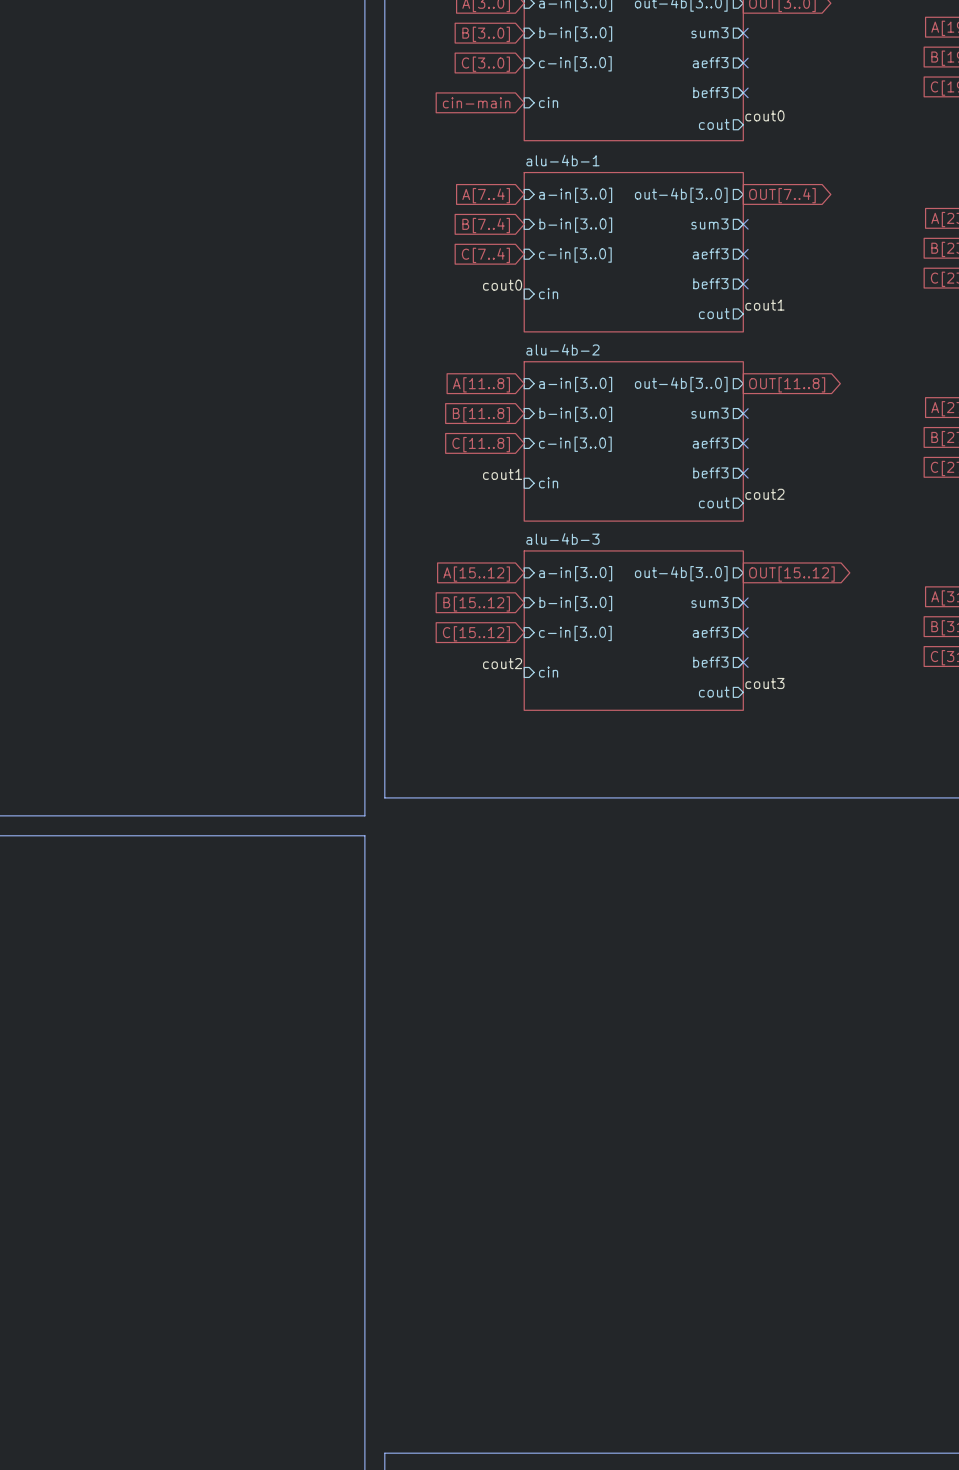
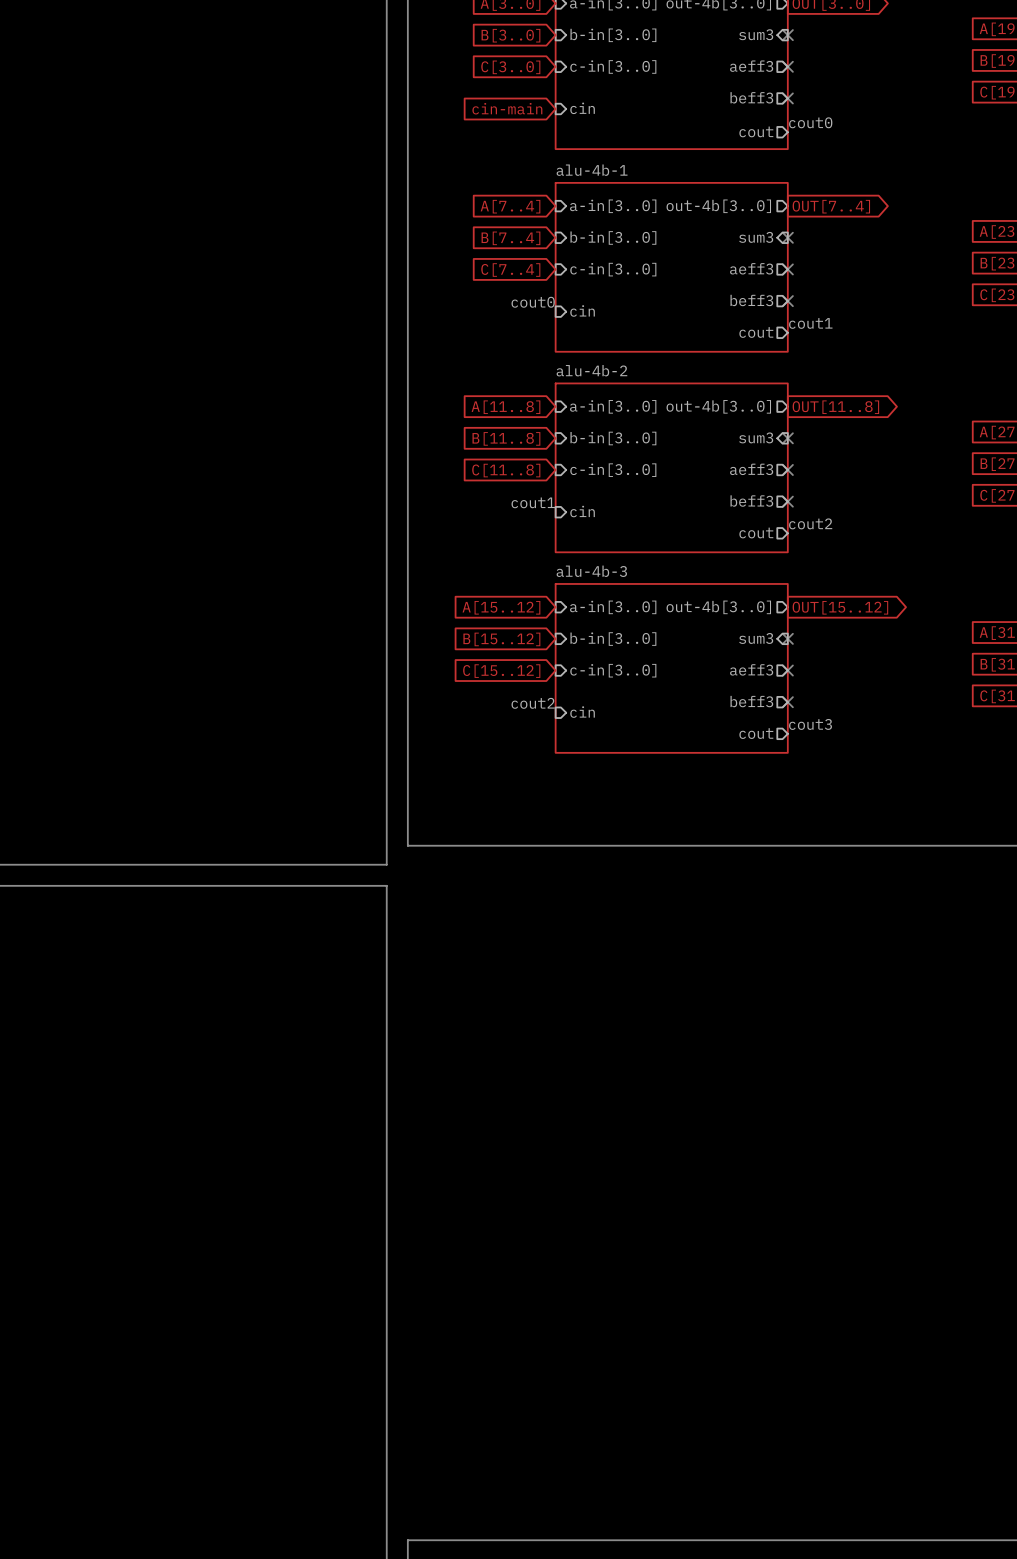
sheet pin shape: output (709, 32) -> input (756, 34)
sheet pin shape: output (709, 223) -> input (756, 237)
sheet pin shape: output (709, 413) -> input (756, 437)
sheet pin shape: output (709, 602) -> input (756, 638)

